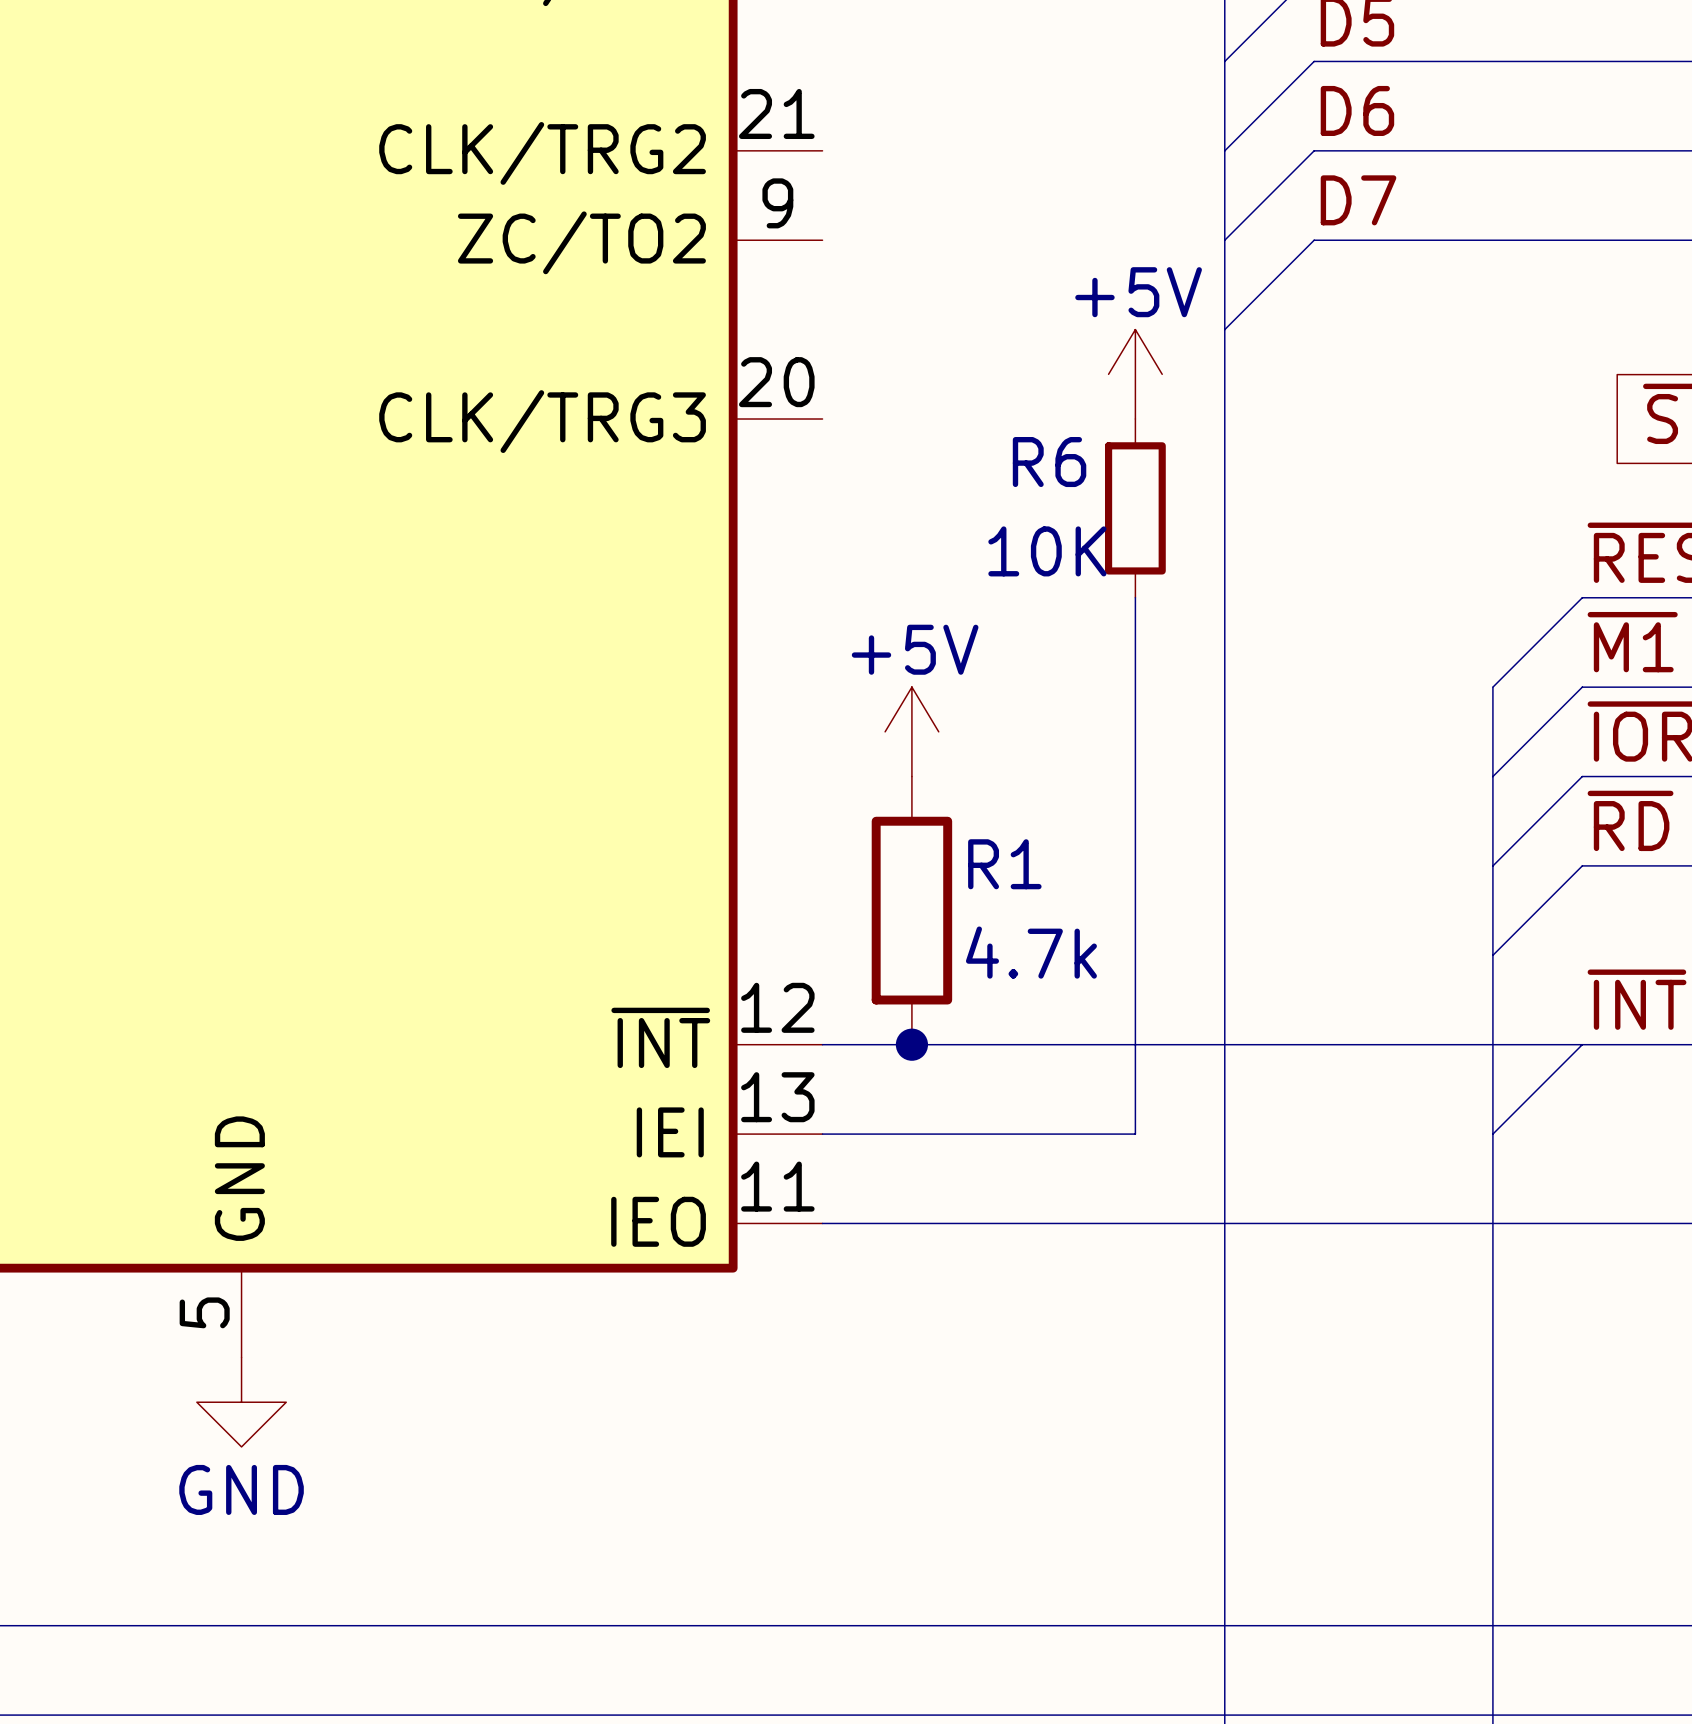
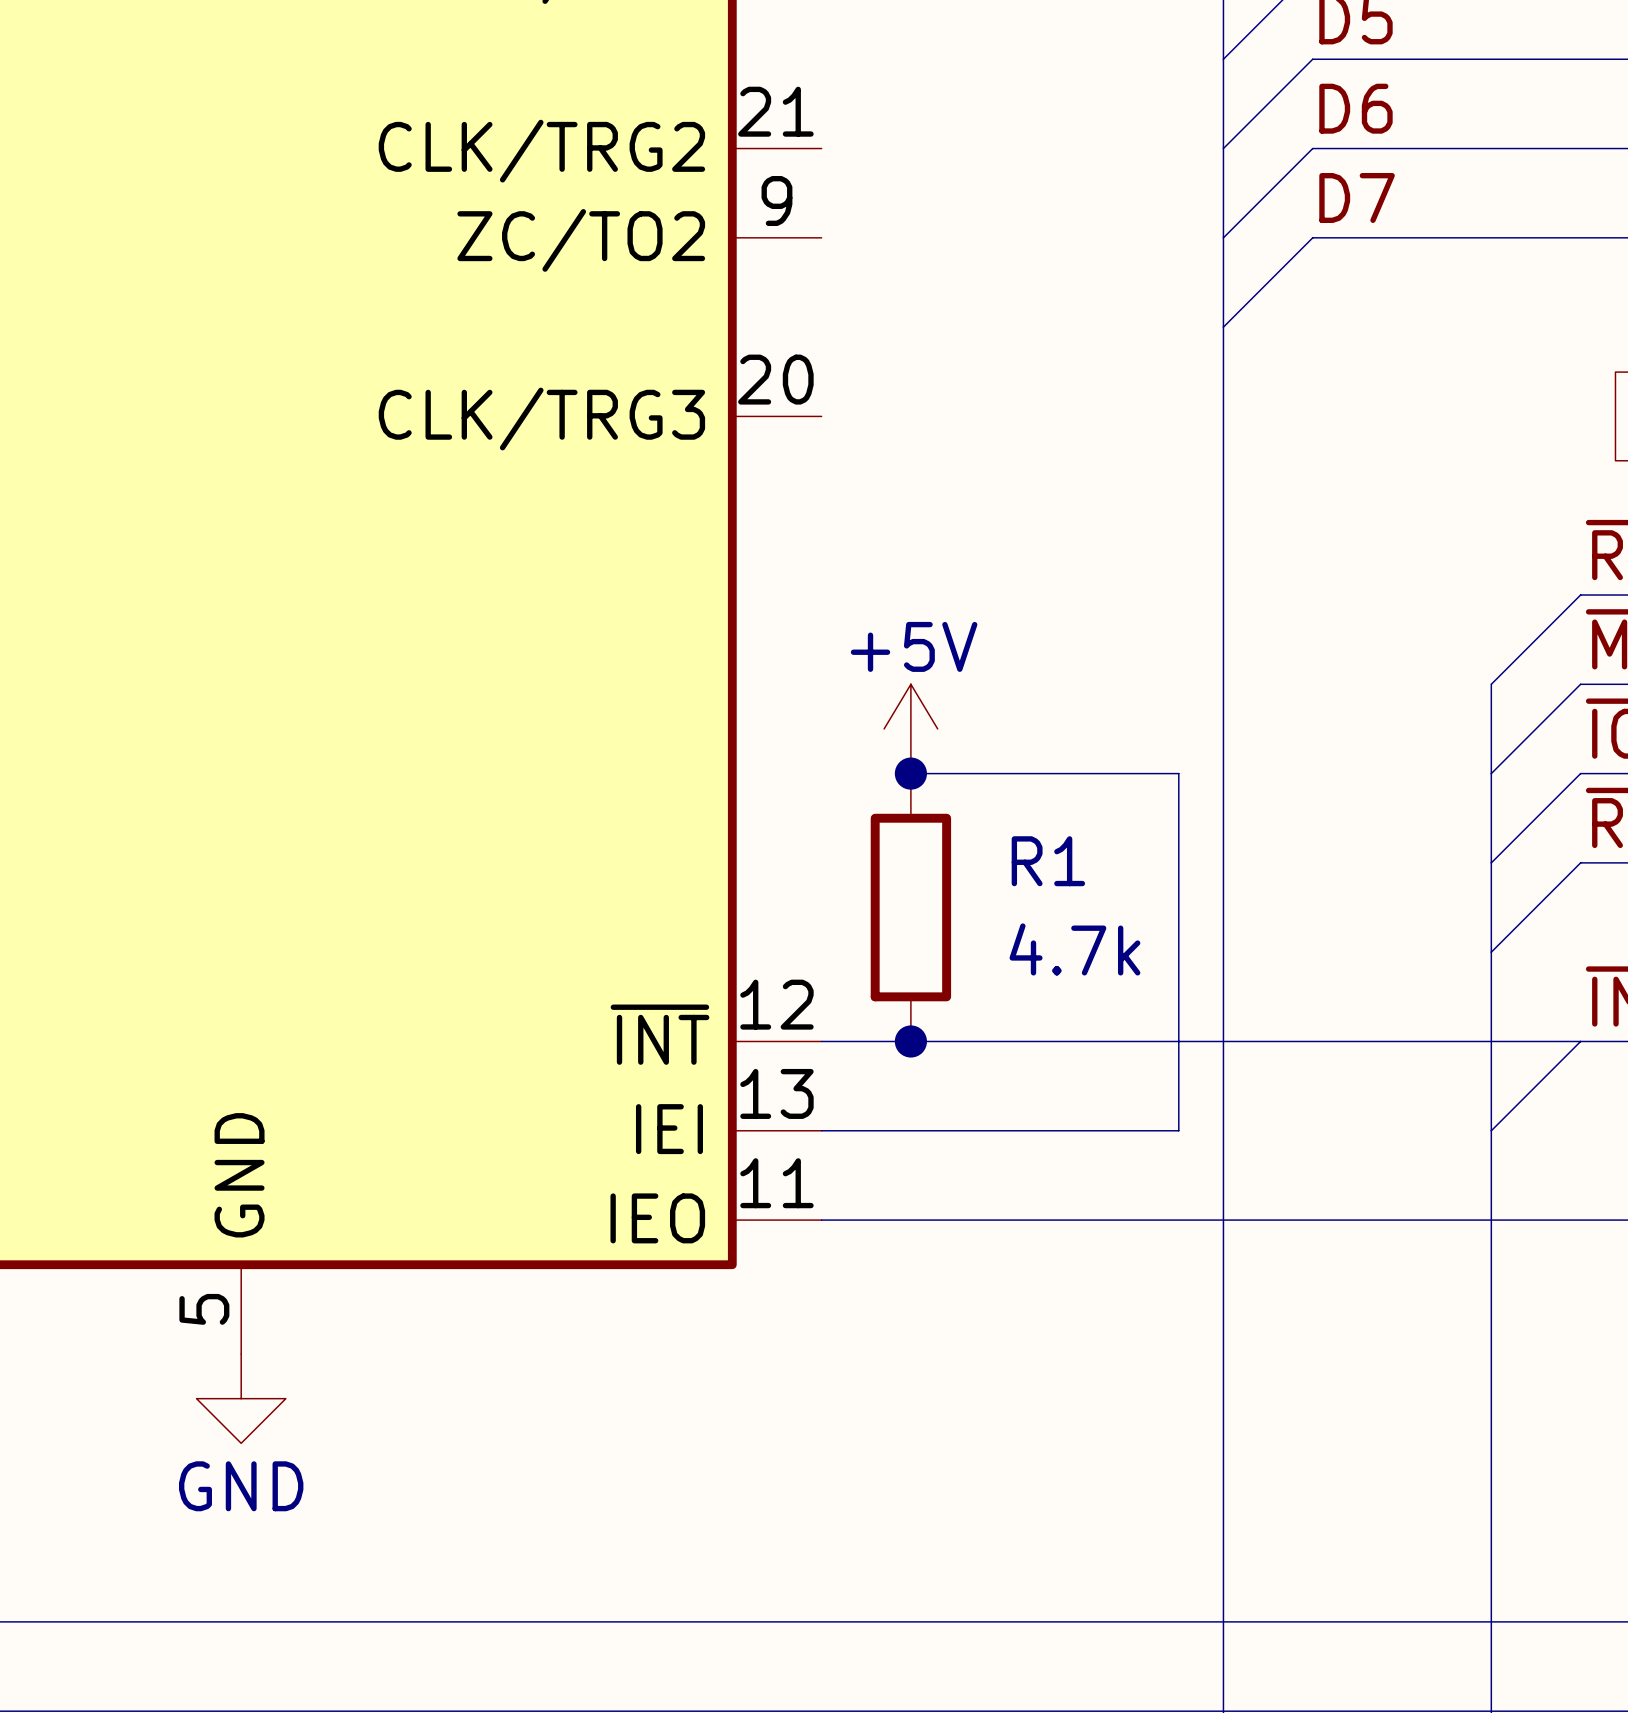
power symbol: +5V (1135, 374) -> none
R6: 10K (1135, 508) -> none
wire: (1135, 597) (1135, 1134) -> (910, 773) (1178, 773) (1178, 1130) (1134, 1130)
junction: none -> (910, 773)
R1 name position: R1 (1004, 864) -> R1 (1048, 861)
R1 value position: 4.7k (1031, 952) -> 4.7k (1074, 949)

